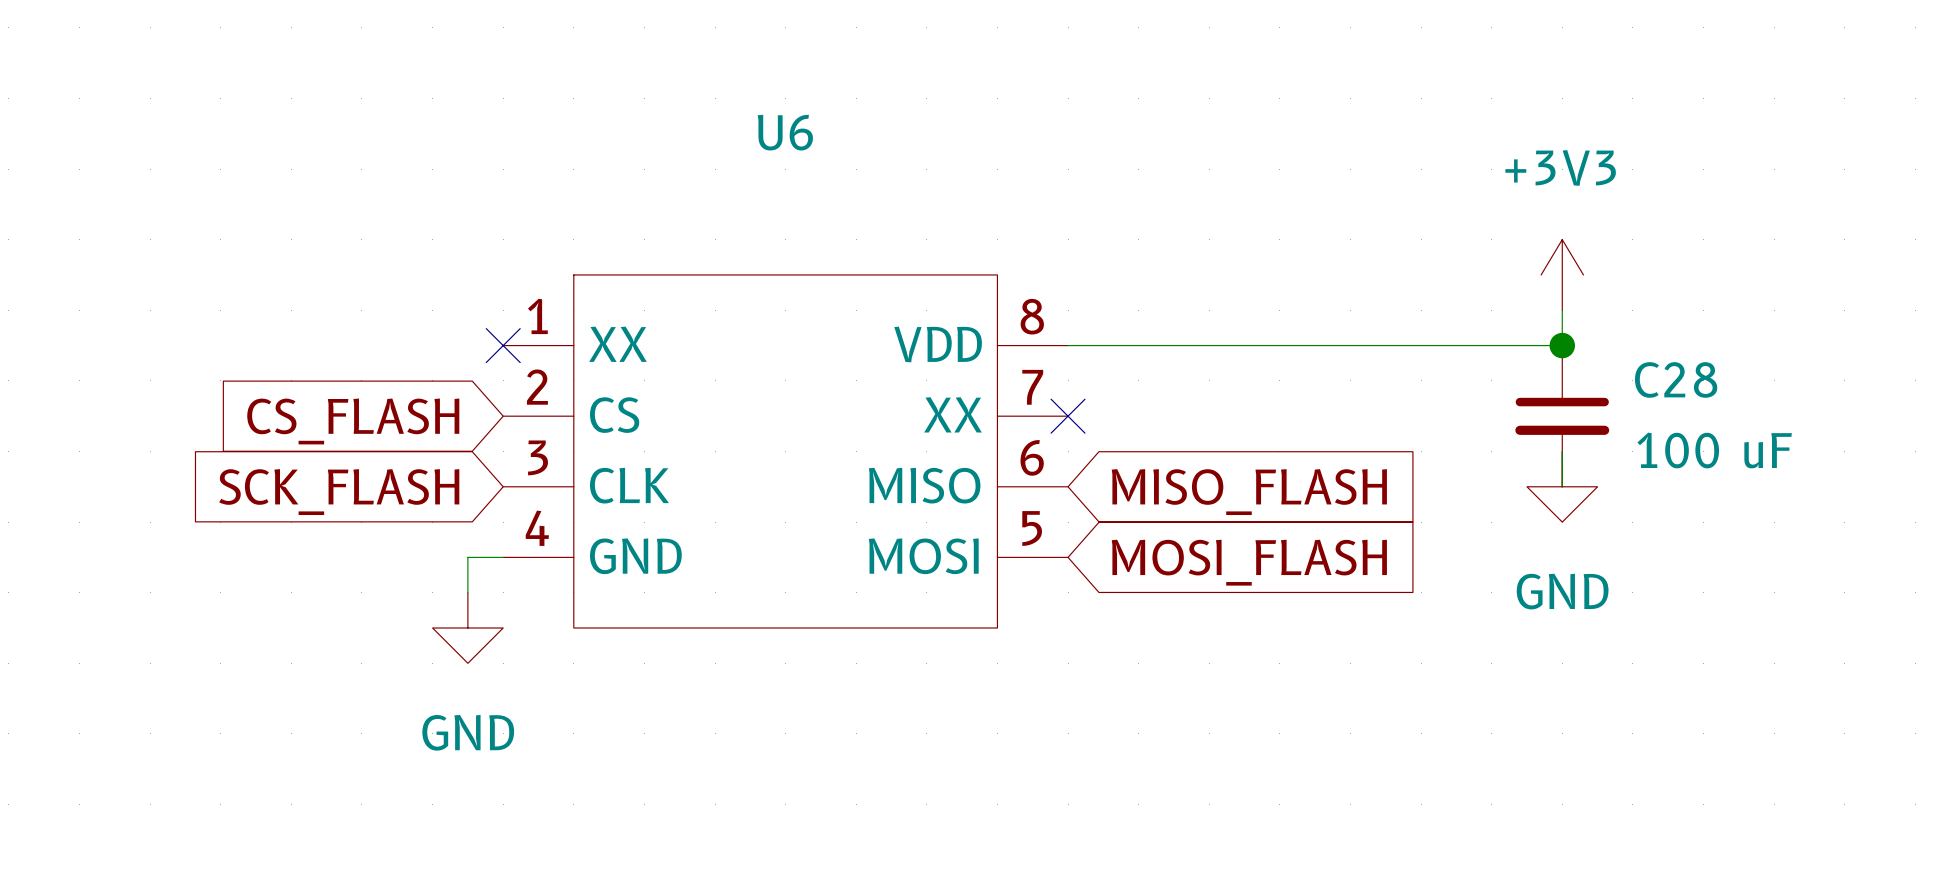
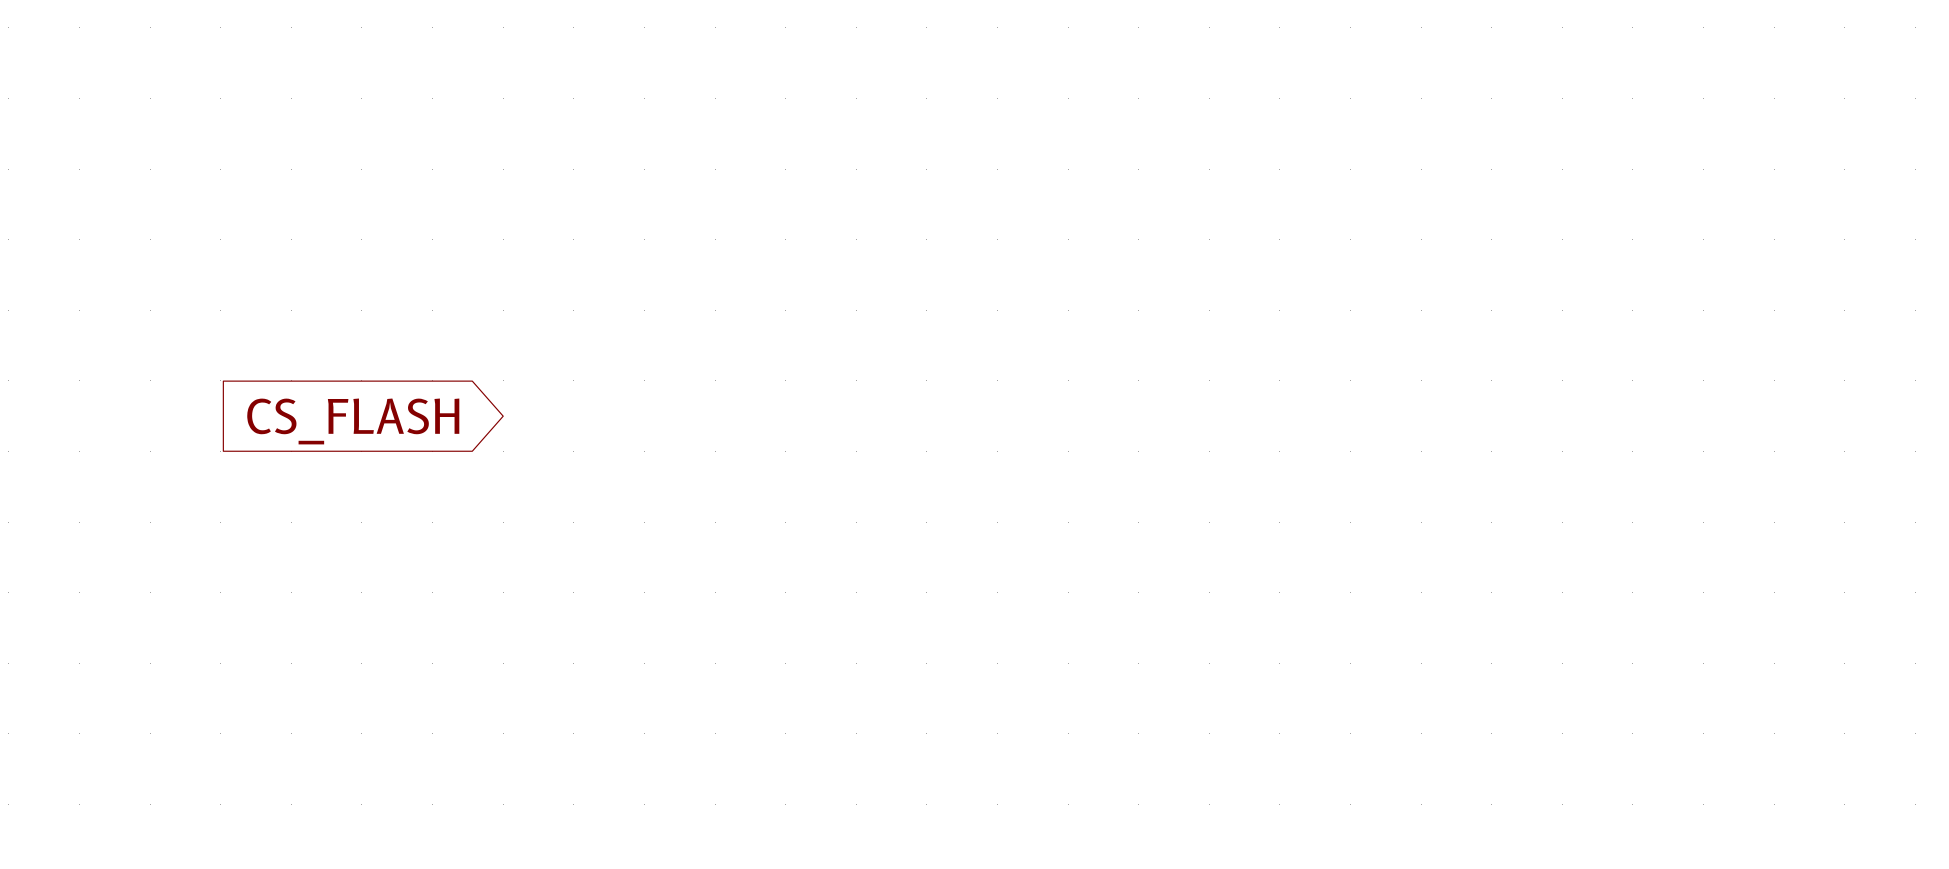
power symbol: +3V3 (1562, 274) -> none
wire: (1562, 310) (1562, 345) (1068, 345) -> none
no-connect mark: (503, 345) -> none
junction: (1562, 345) -> none
no-connect mark: (1068, 416) -> none
C28: 100 uF (1562, 416) -> none
U6: (785, 451) -> none
wire: (1562, 451) (1562, 486) -> none
power symbol: GND (1562, 486) -> none
global label: SCK_FLASH (339, 492) -> none
global label: MISO_FLASH (1249, 492) -> none
wire: (503, 557) (467, 557) (467, 592) -> none
global label: MOSI_FLASH (1249, 562) -> none
power symbol: GND (467, 628) -> none

